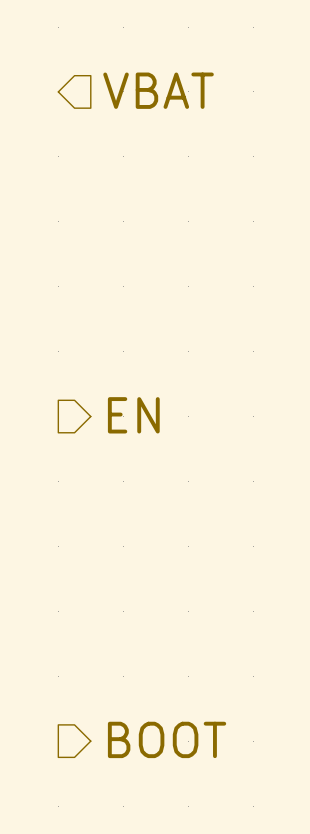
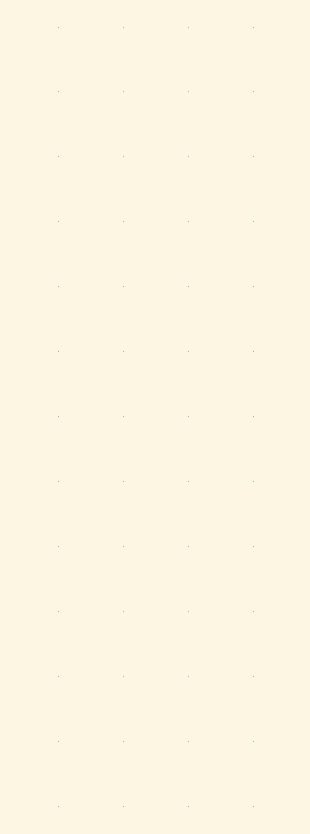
hierarchical label: VBAT (158, 90) -> none
hierarchical label: EN (133, 415) -> none
hierarchical label: BOOT (167, 739) -> none

